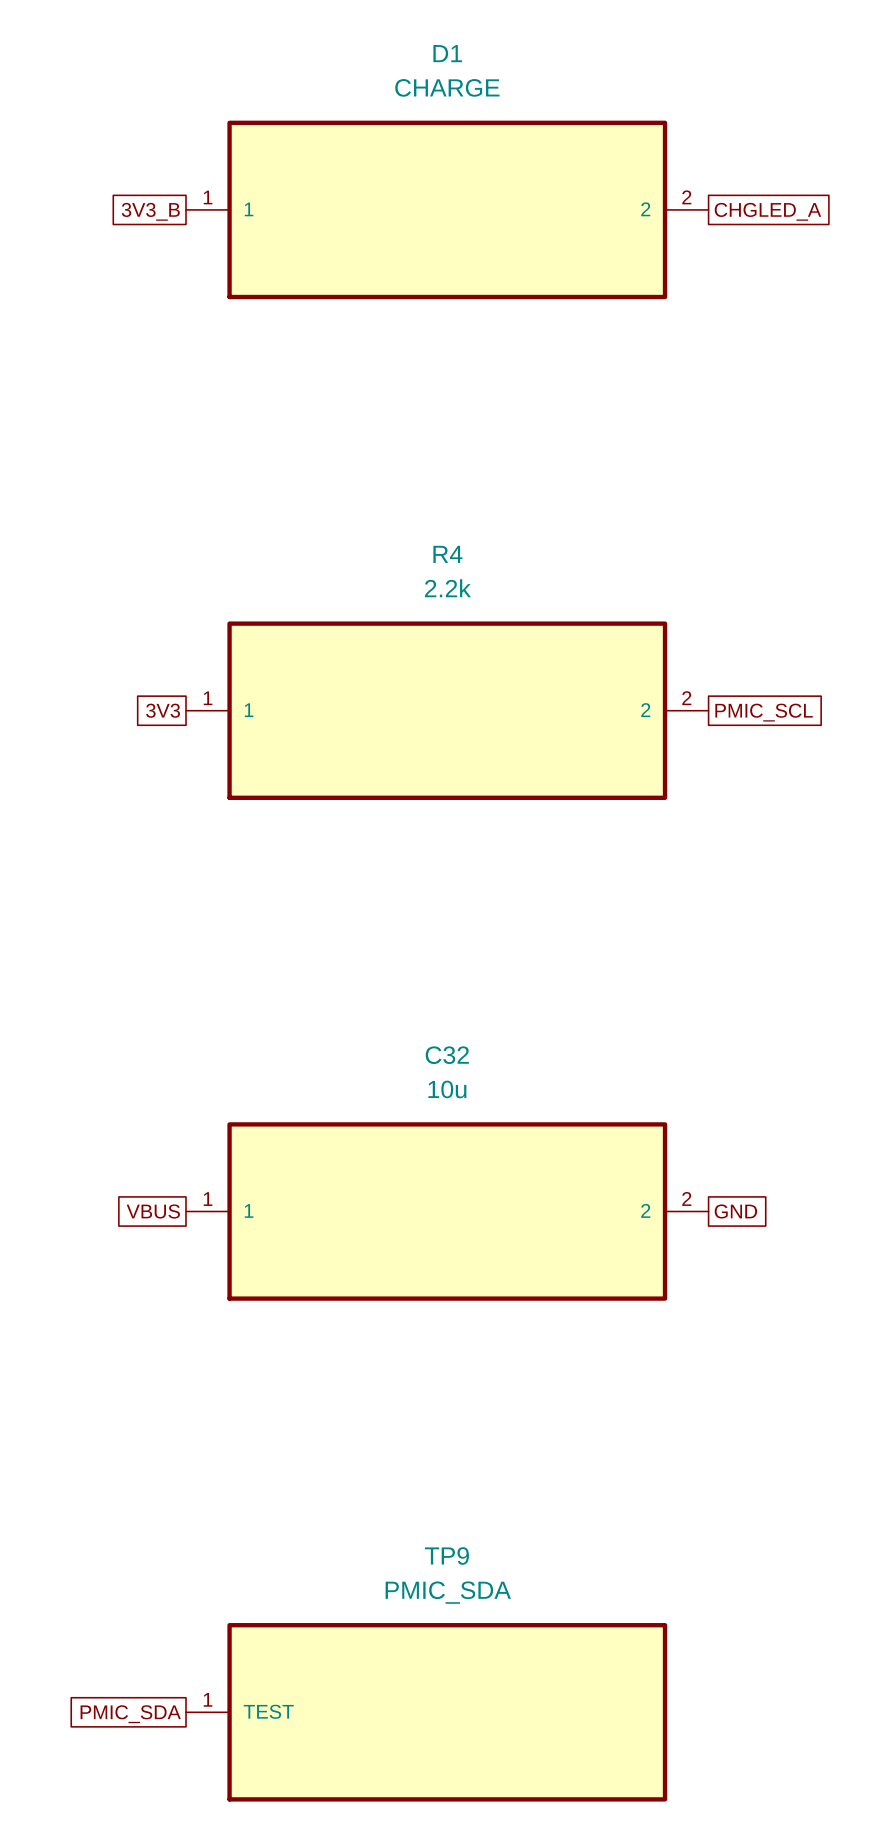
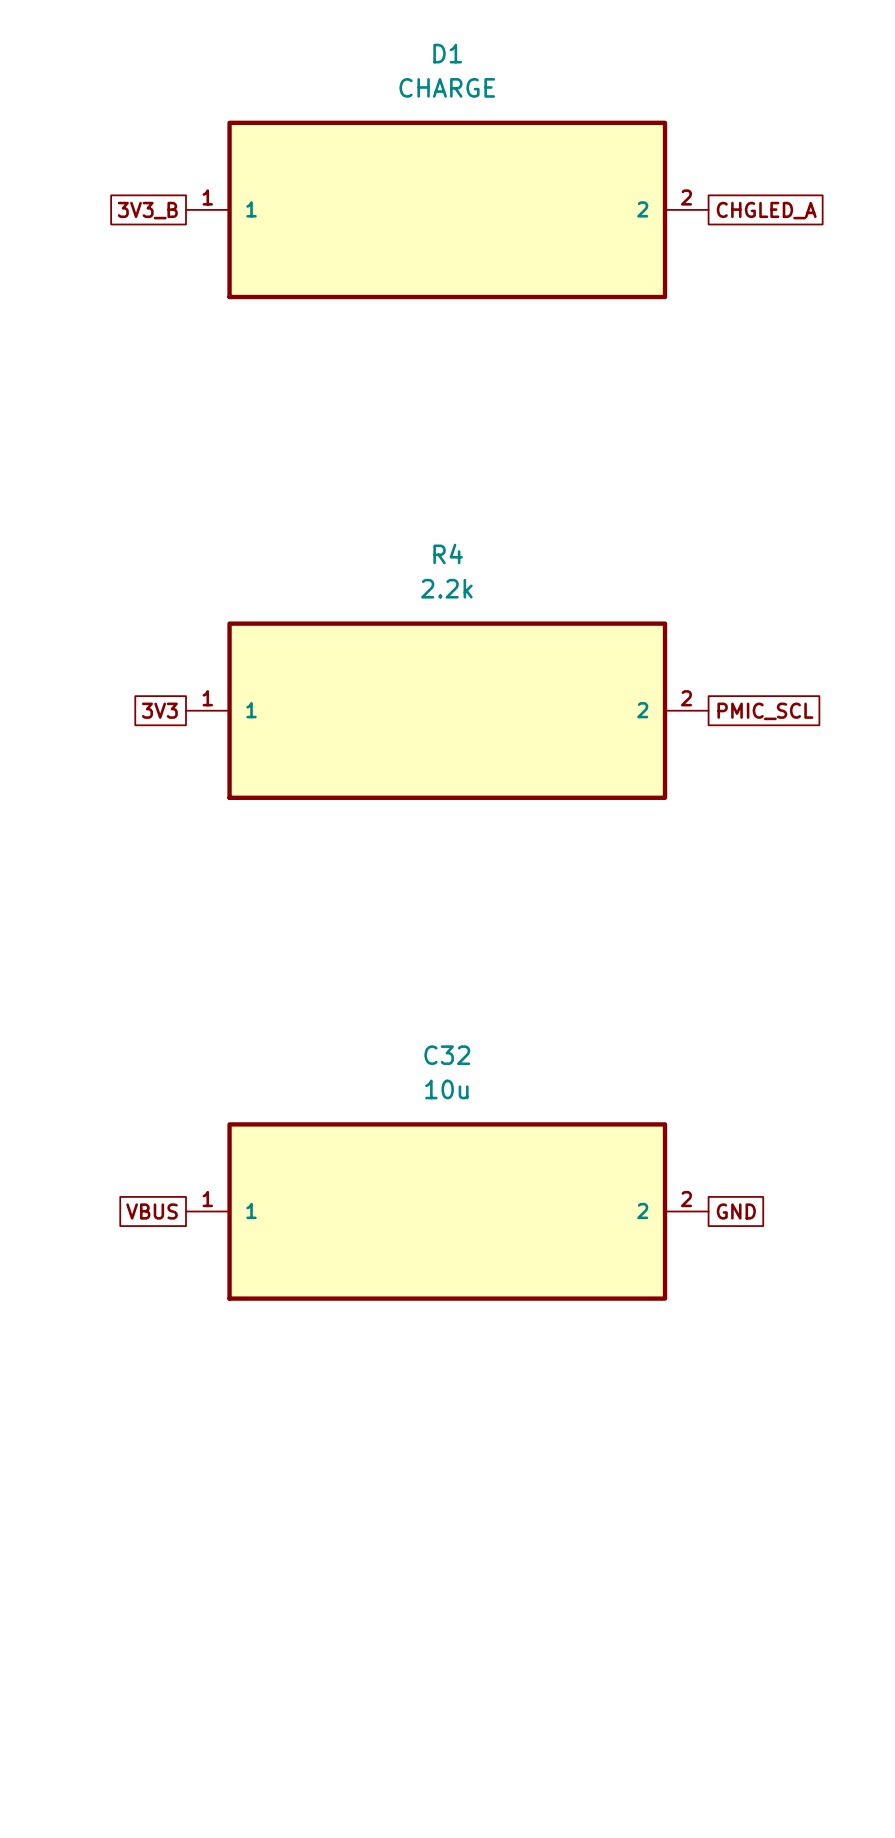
TP9: PMIC_SDA (426, 1712) -> none
global label: PMIC_SDA (130, 1714) -> none

